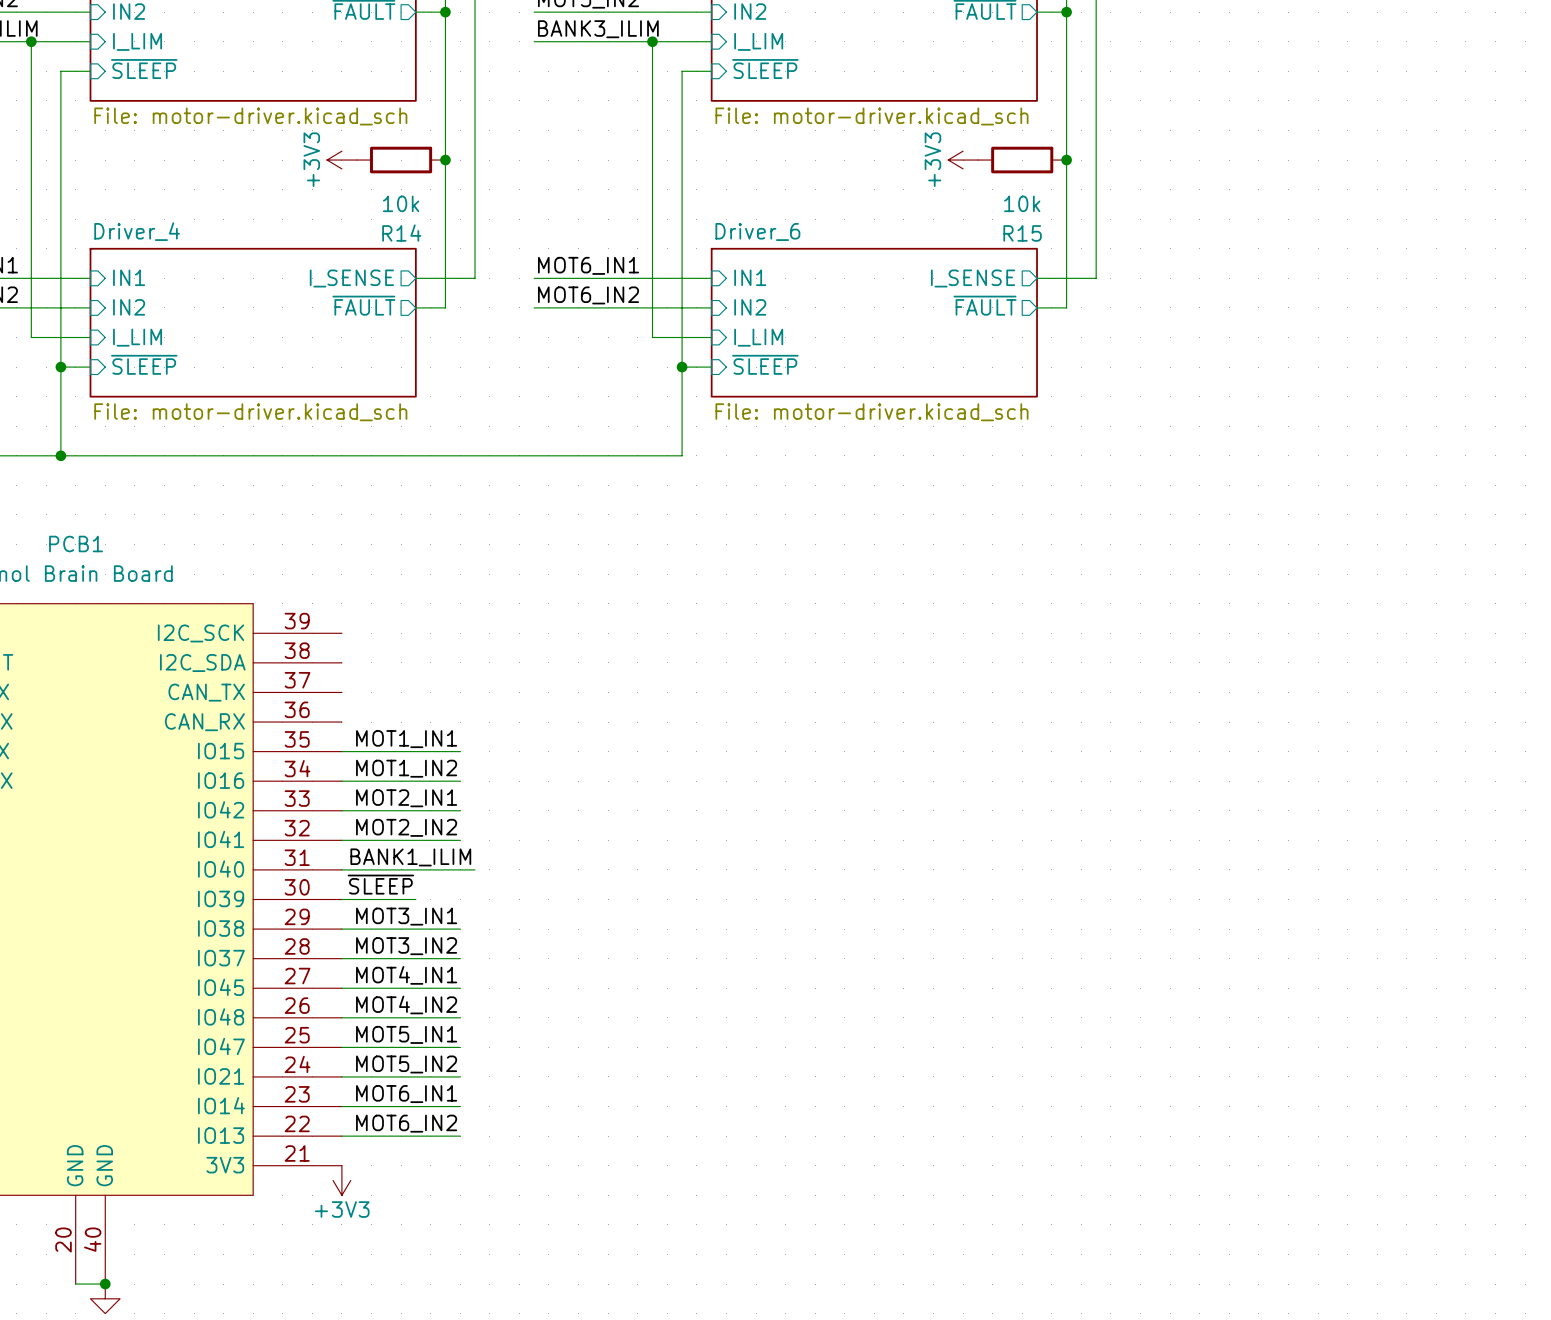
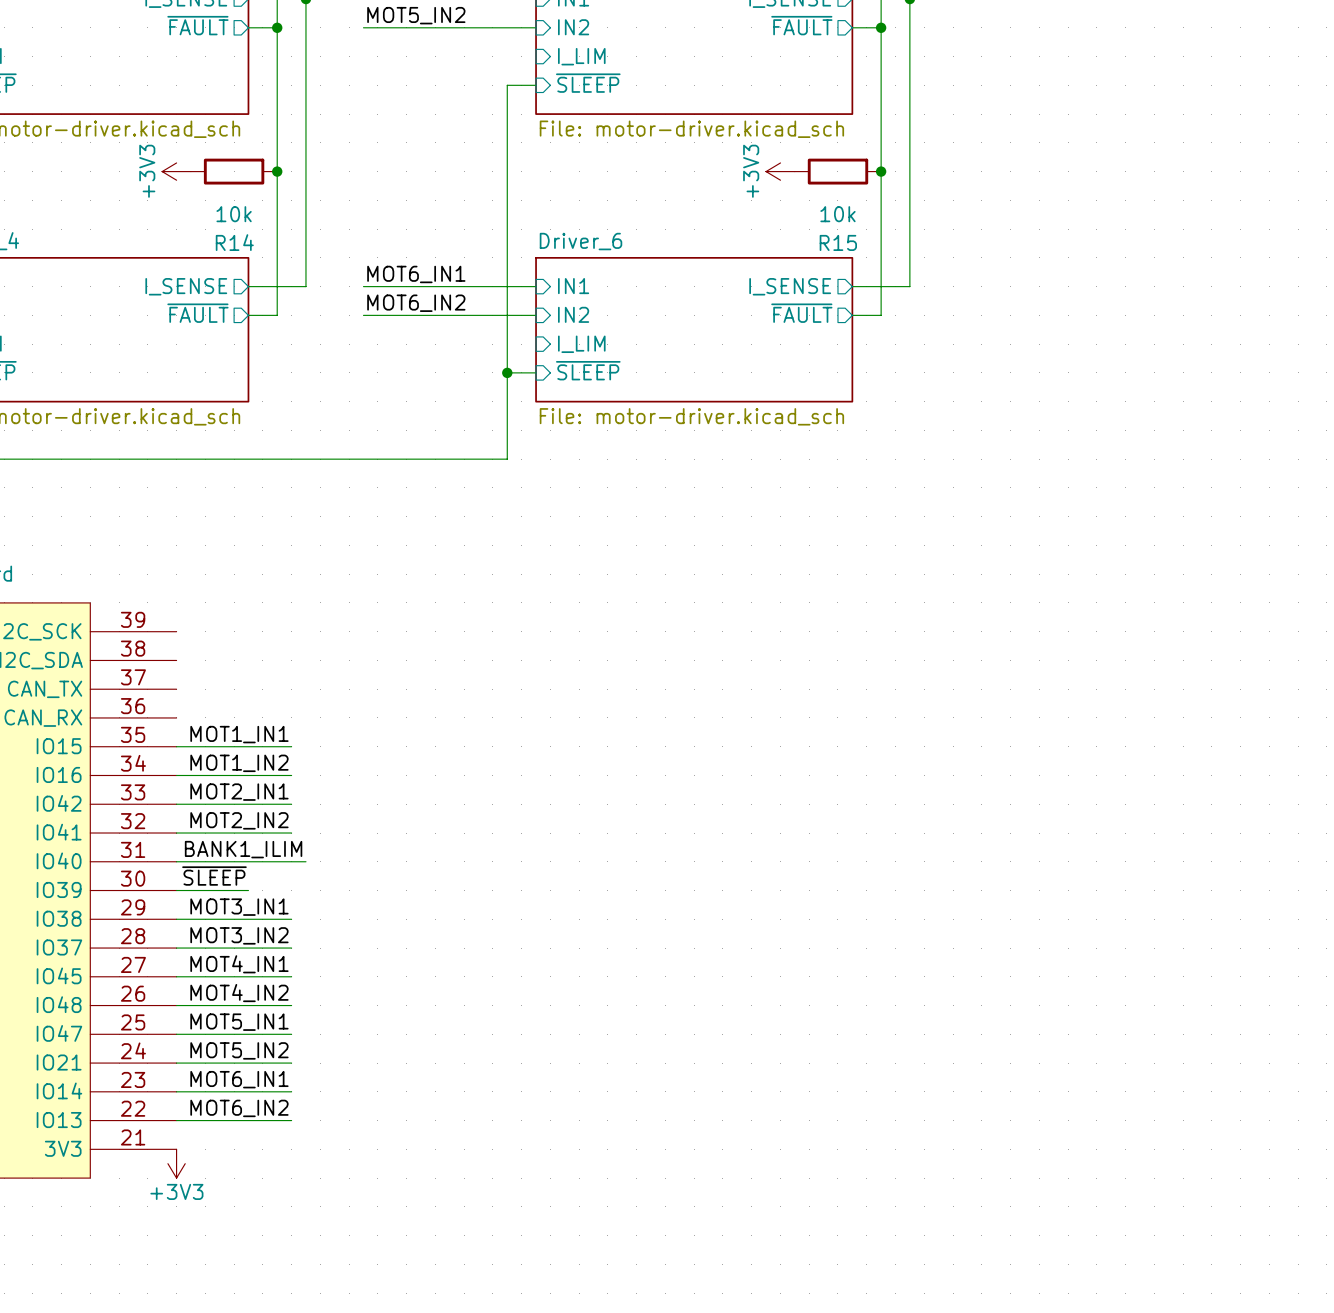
label: BANK3_ILIM (598, 29) -> none
wire: (534, 41) (711, 41) -> none
wire: (652, 41) (652, 337) (711, 337) -> none
junction: (652, 41) -> none

